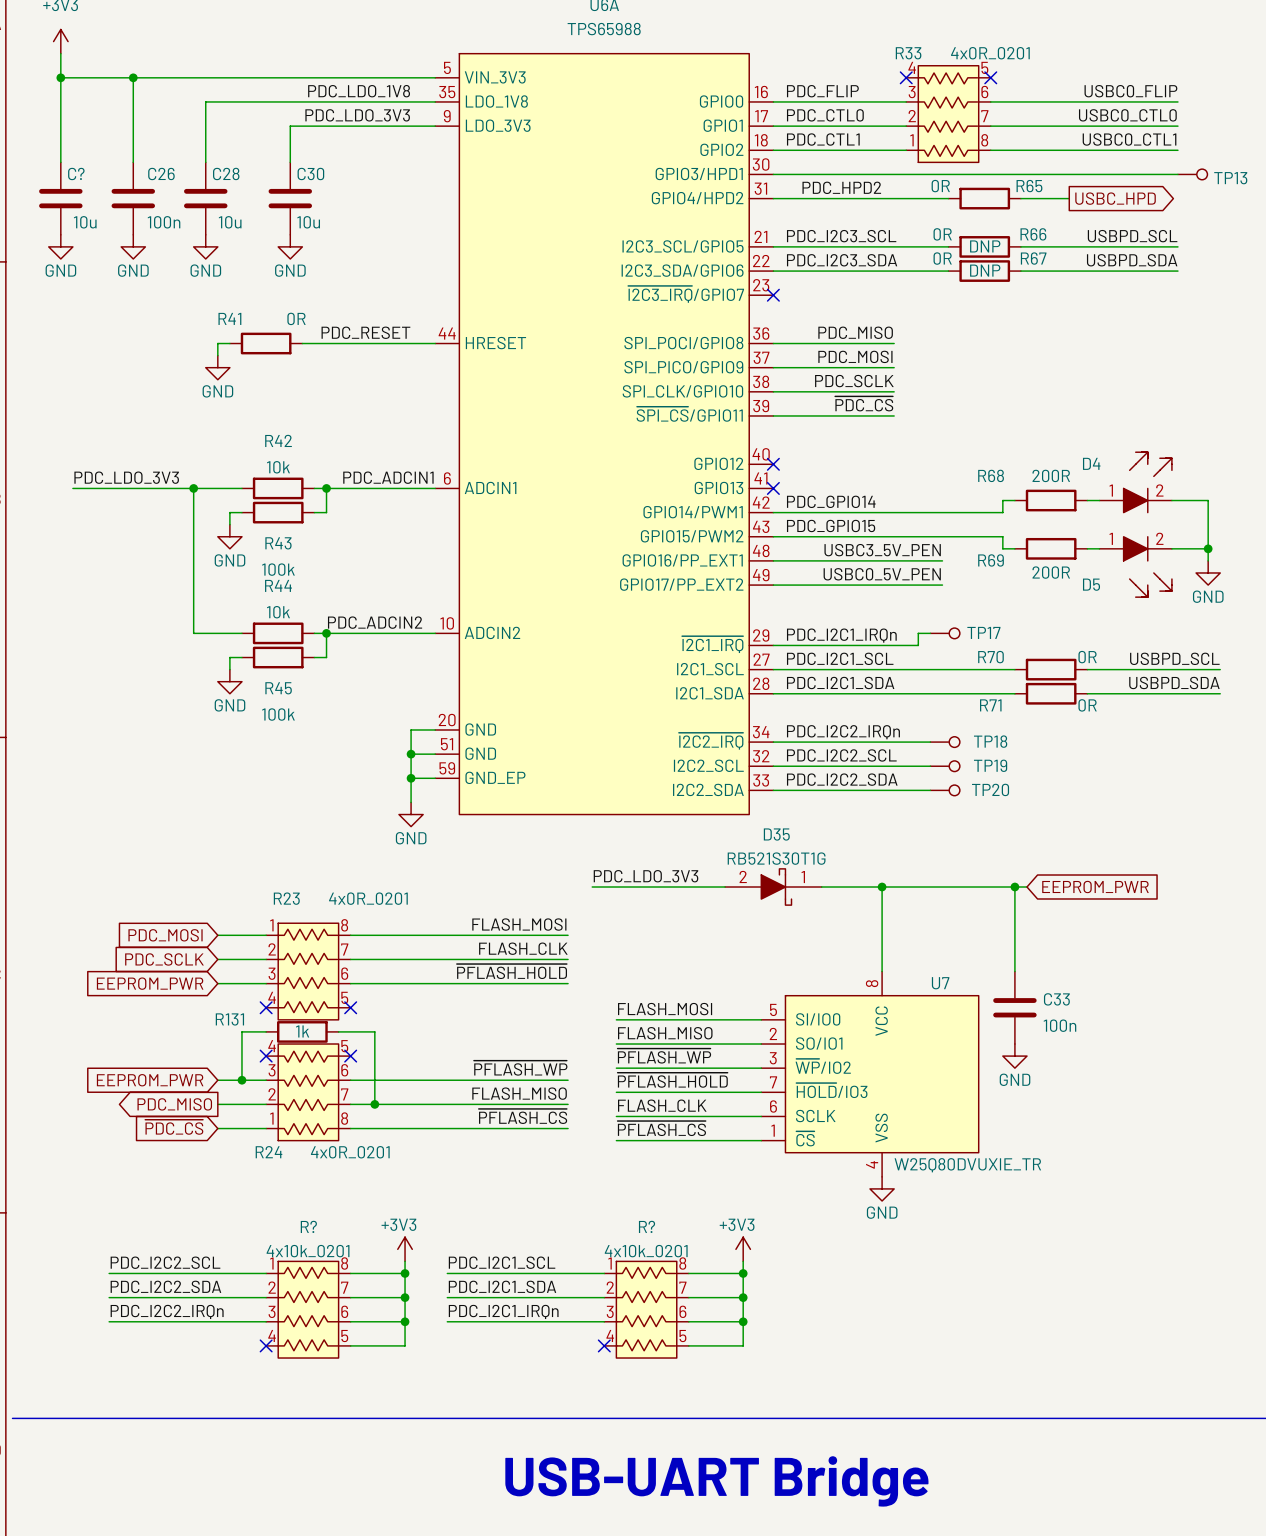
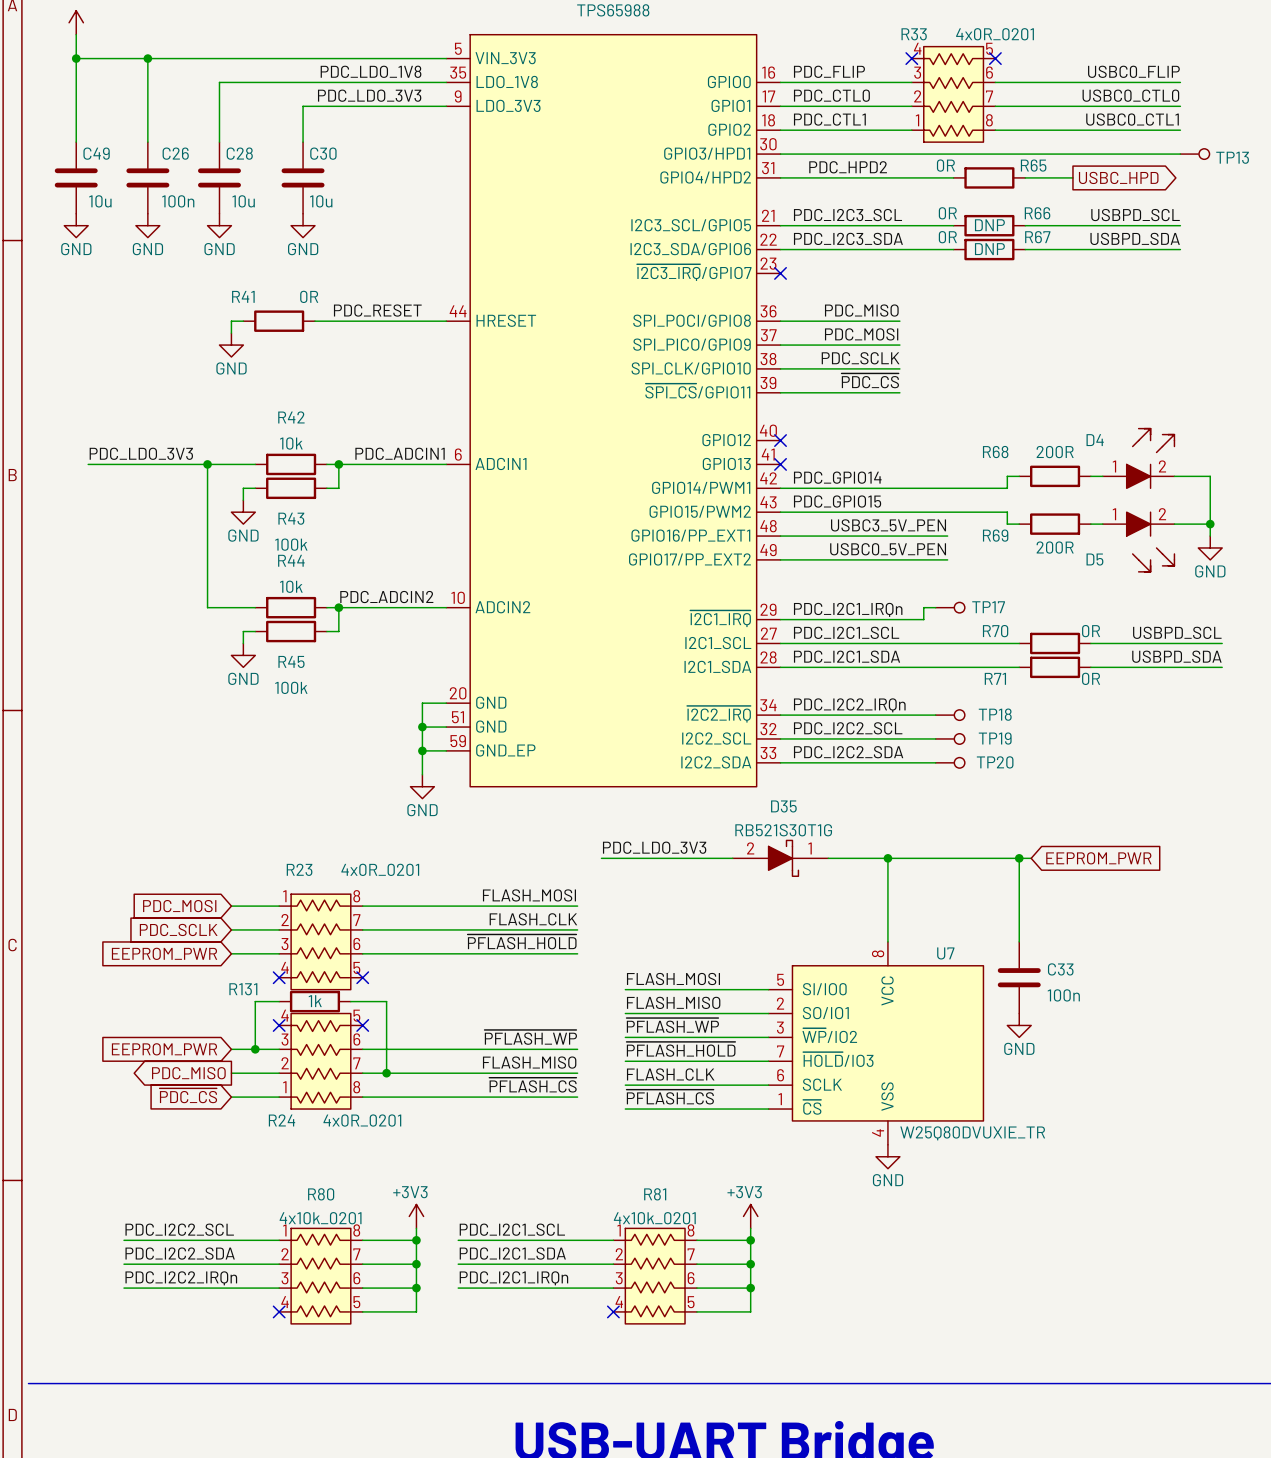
C? name: C? (76, 173) -> C49 (96, 153)
R? name: R? (308, 1226) -> R80 (321, 1194)
R? name: R? (647, 1226) -> R81 (655, 1194)

